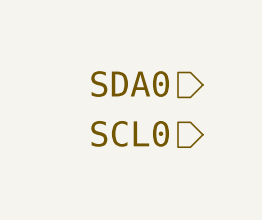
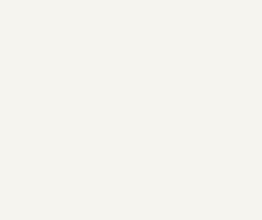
hierarchical label: SDA0 (130, 84) -> none
hierarchical label: SCL0 (130, 133) -> none

